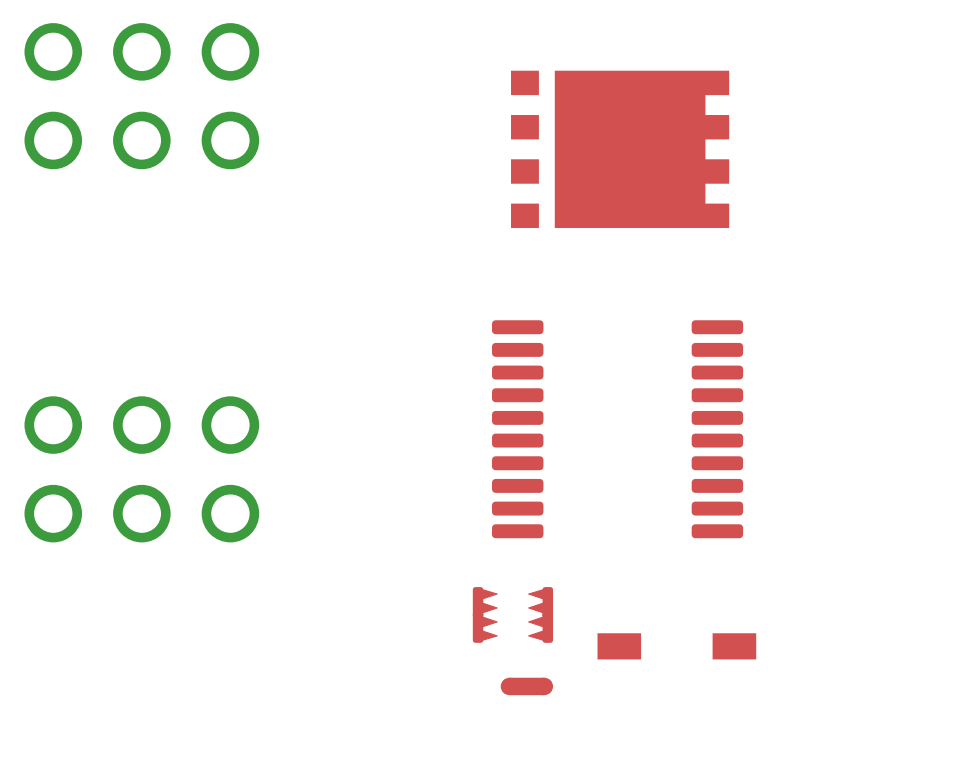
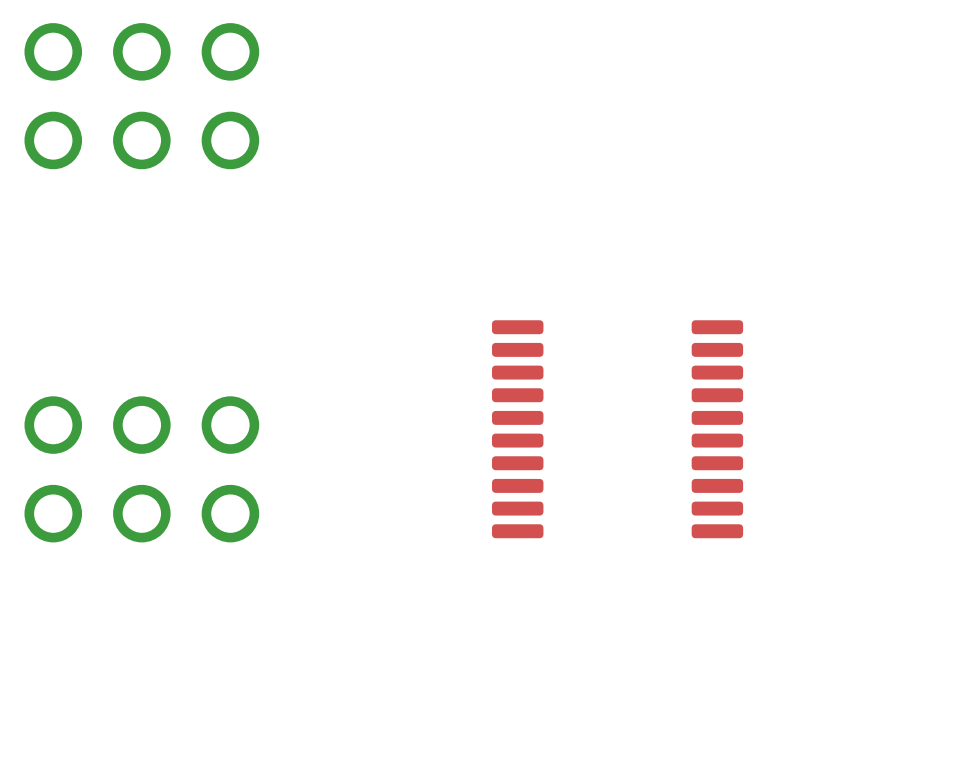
part: (620, 149) -> none
part: (512, 614) -> none
part: (676, 646) -> none
part: (526, 686) -> none

